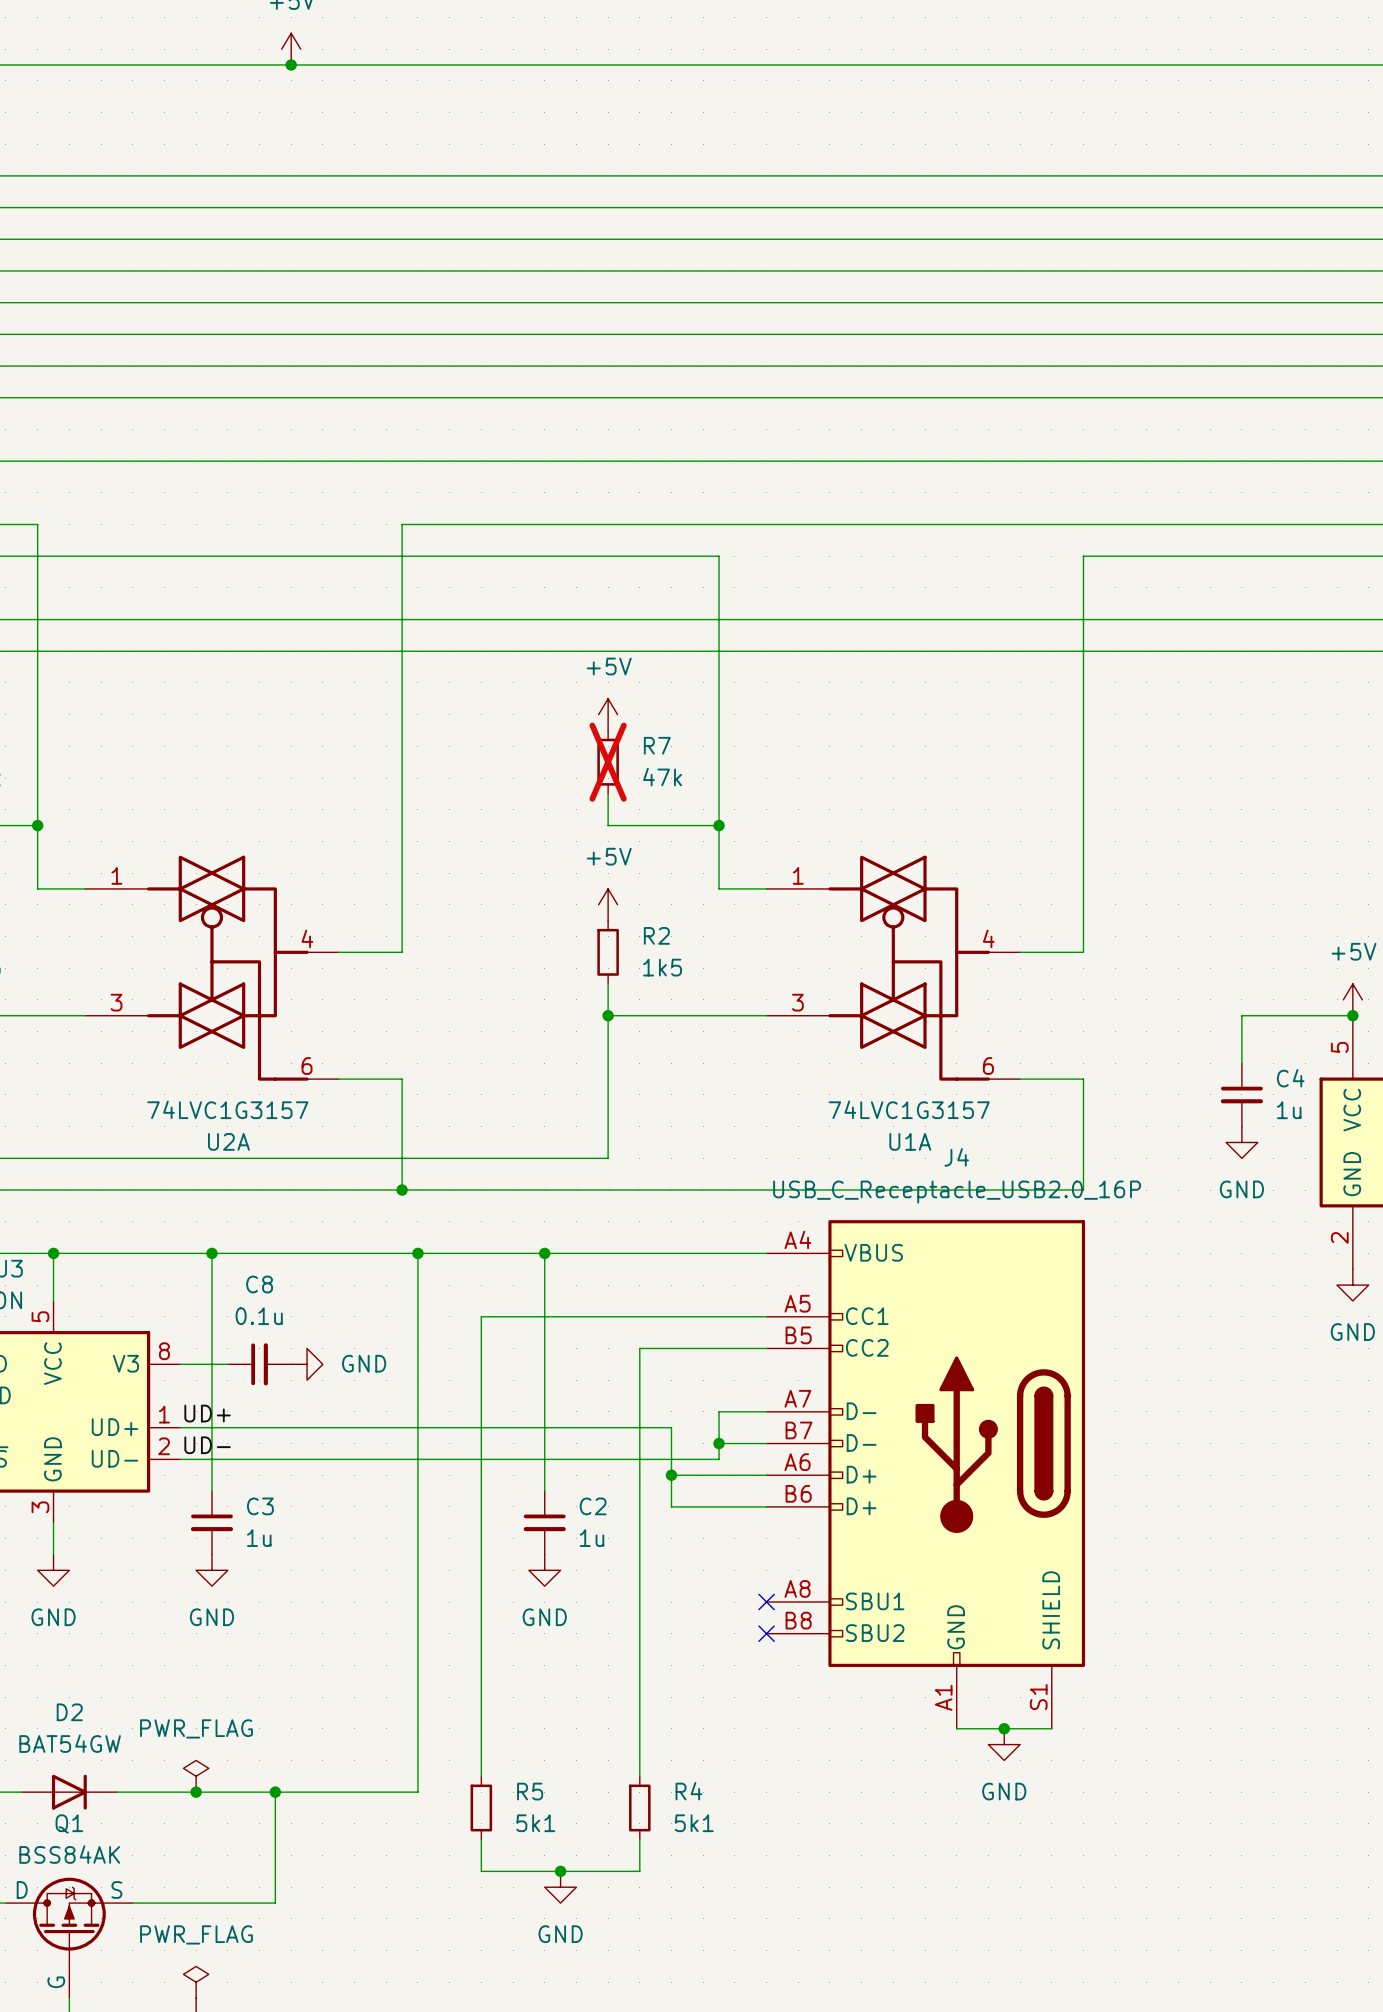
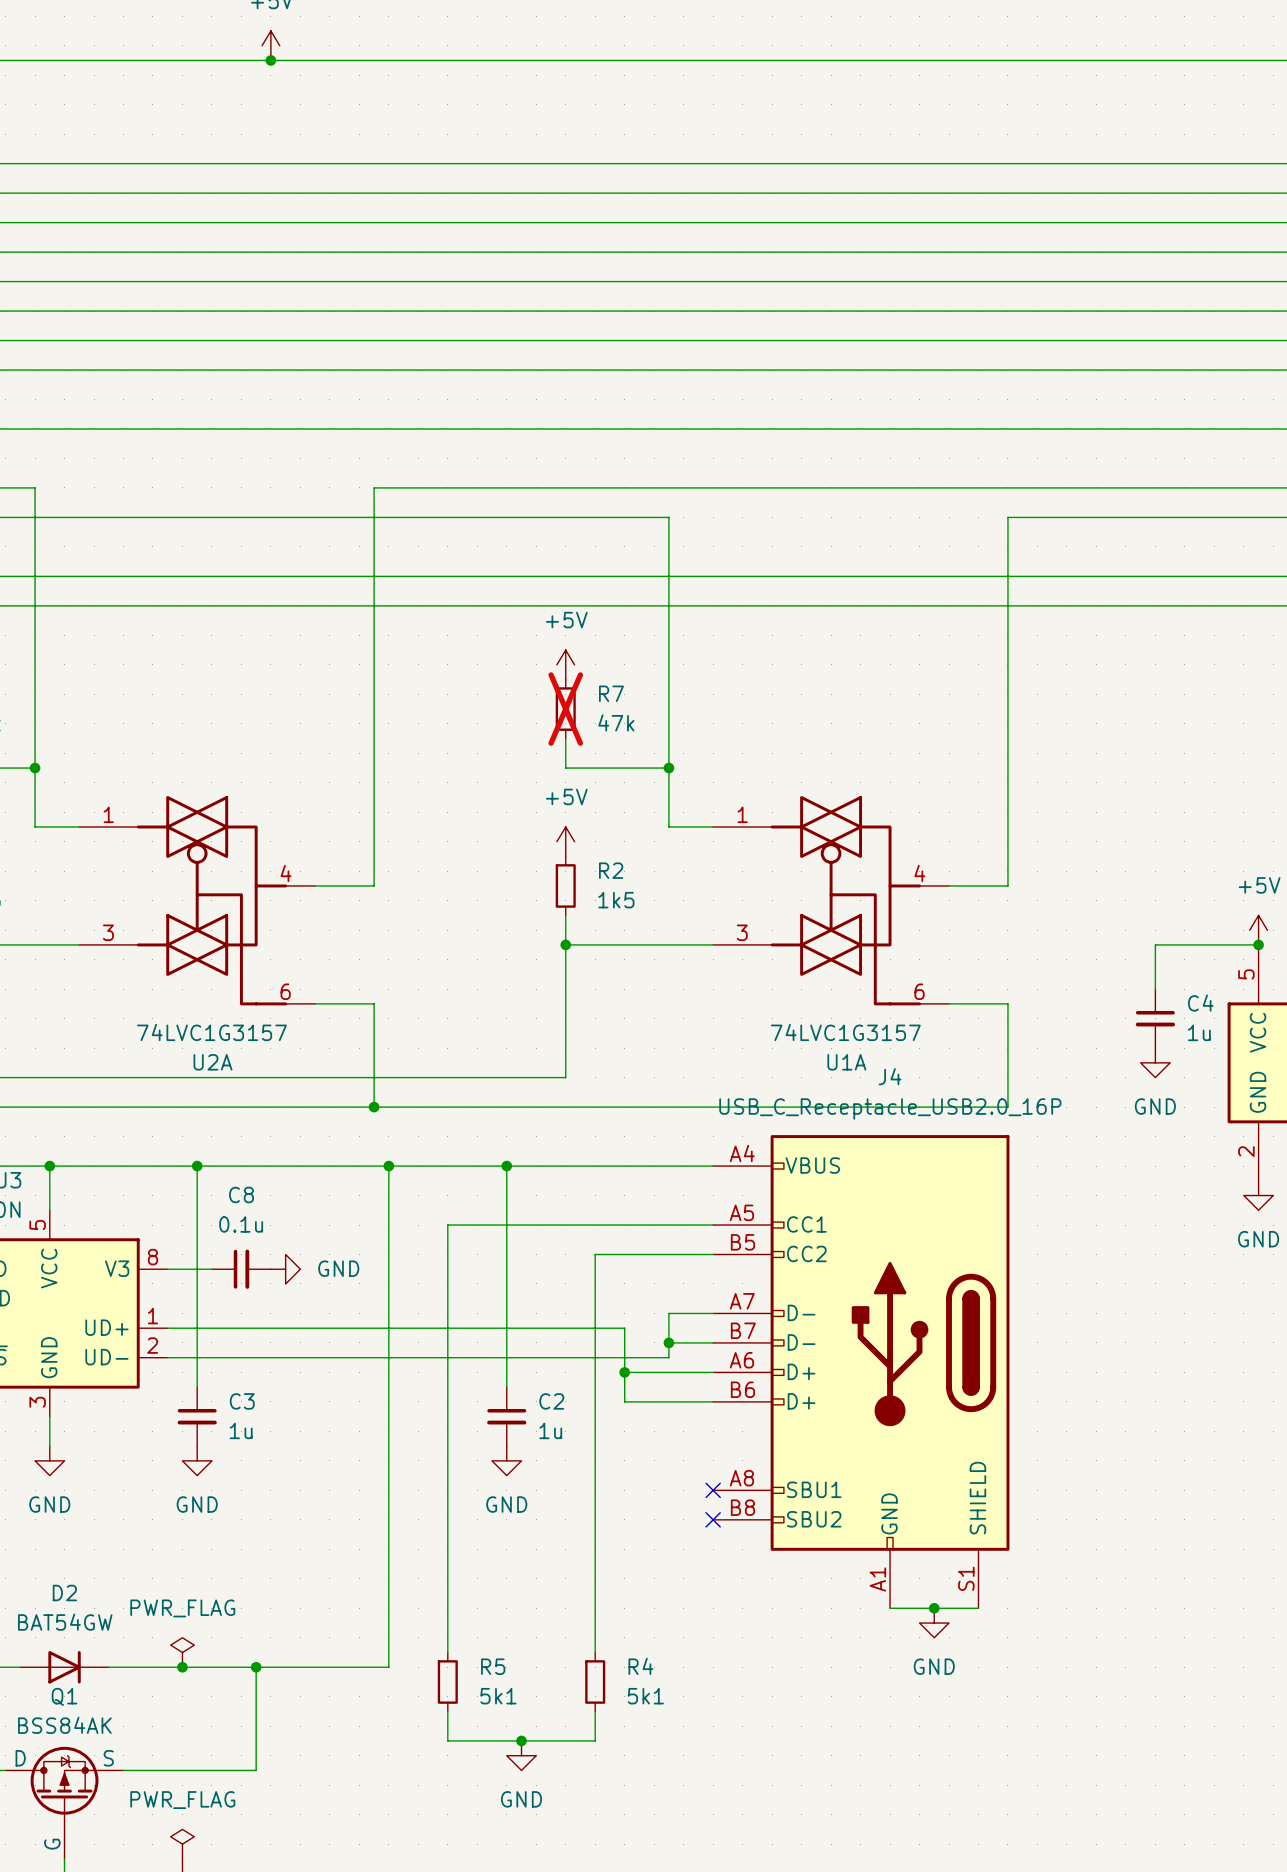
label: UD+ (207, 1413) -> none
label: UD- (207, 1445) -> none

